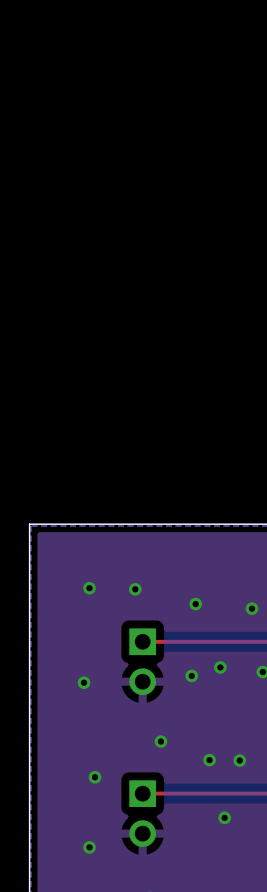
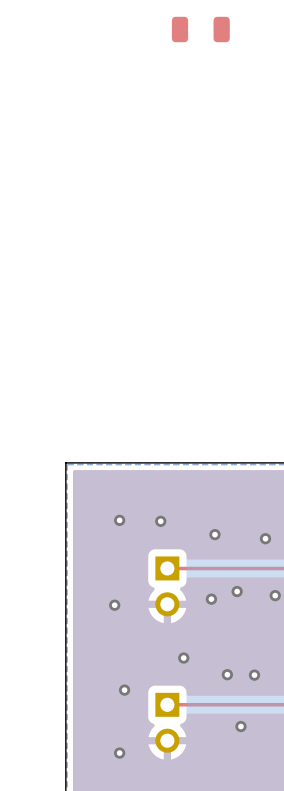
part: none -> (200, 29)

